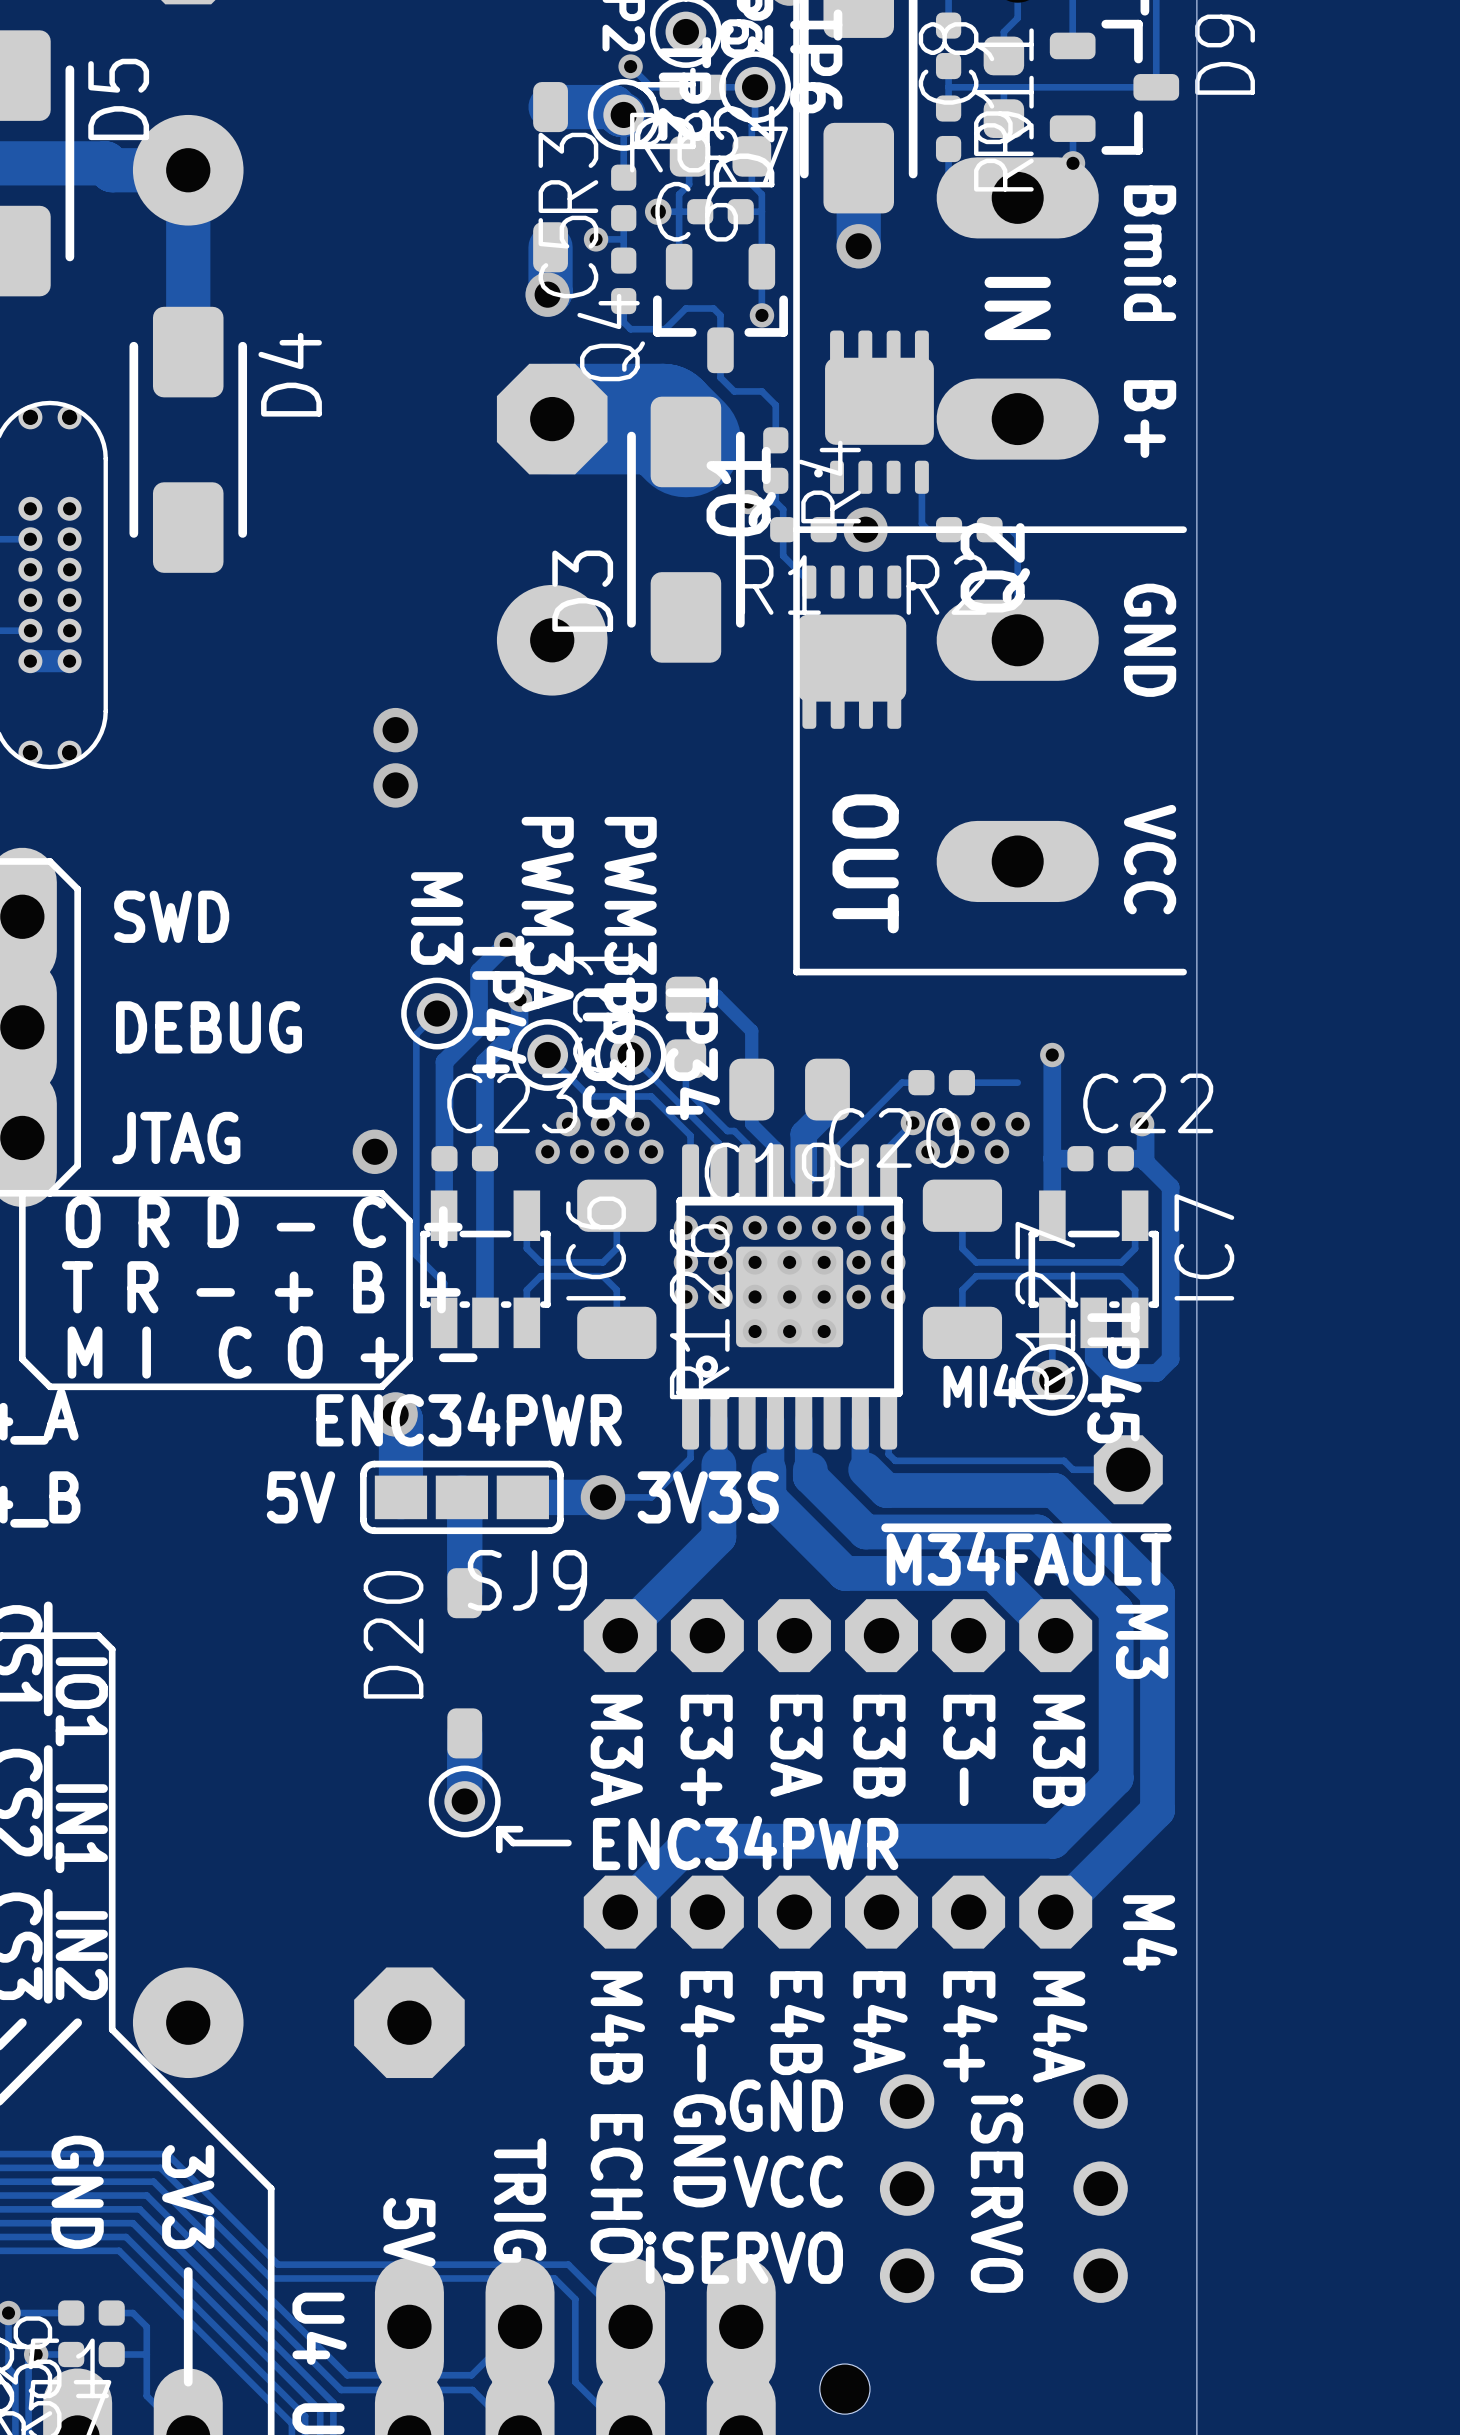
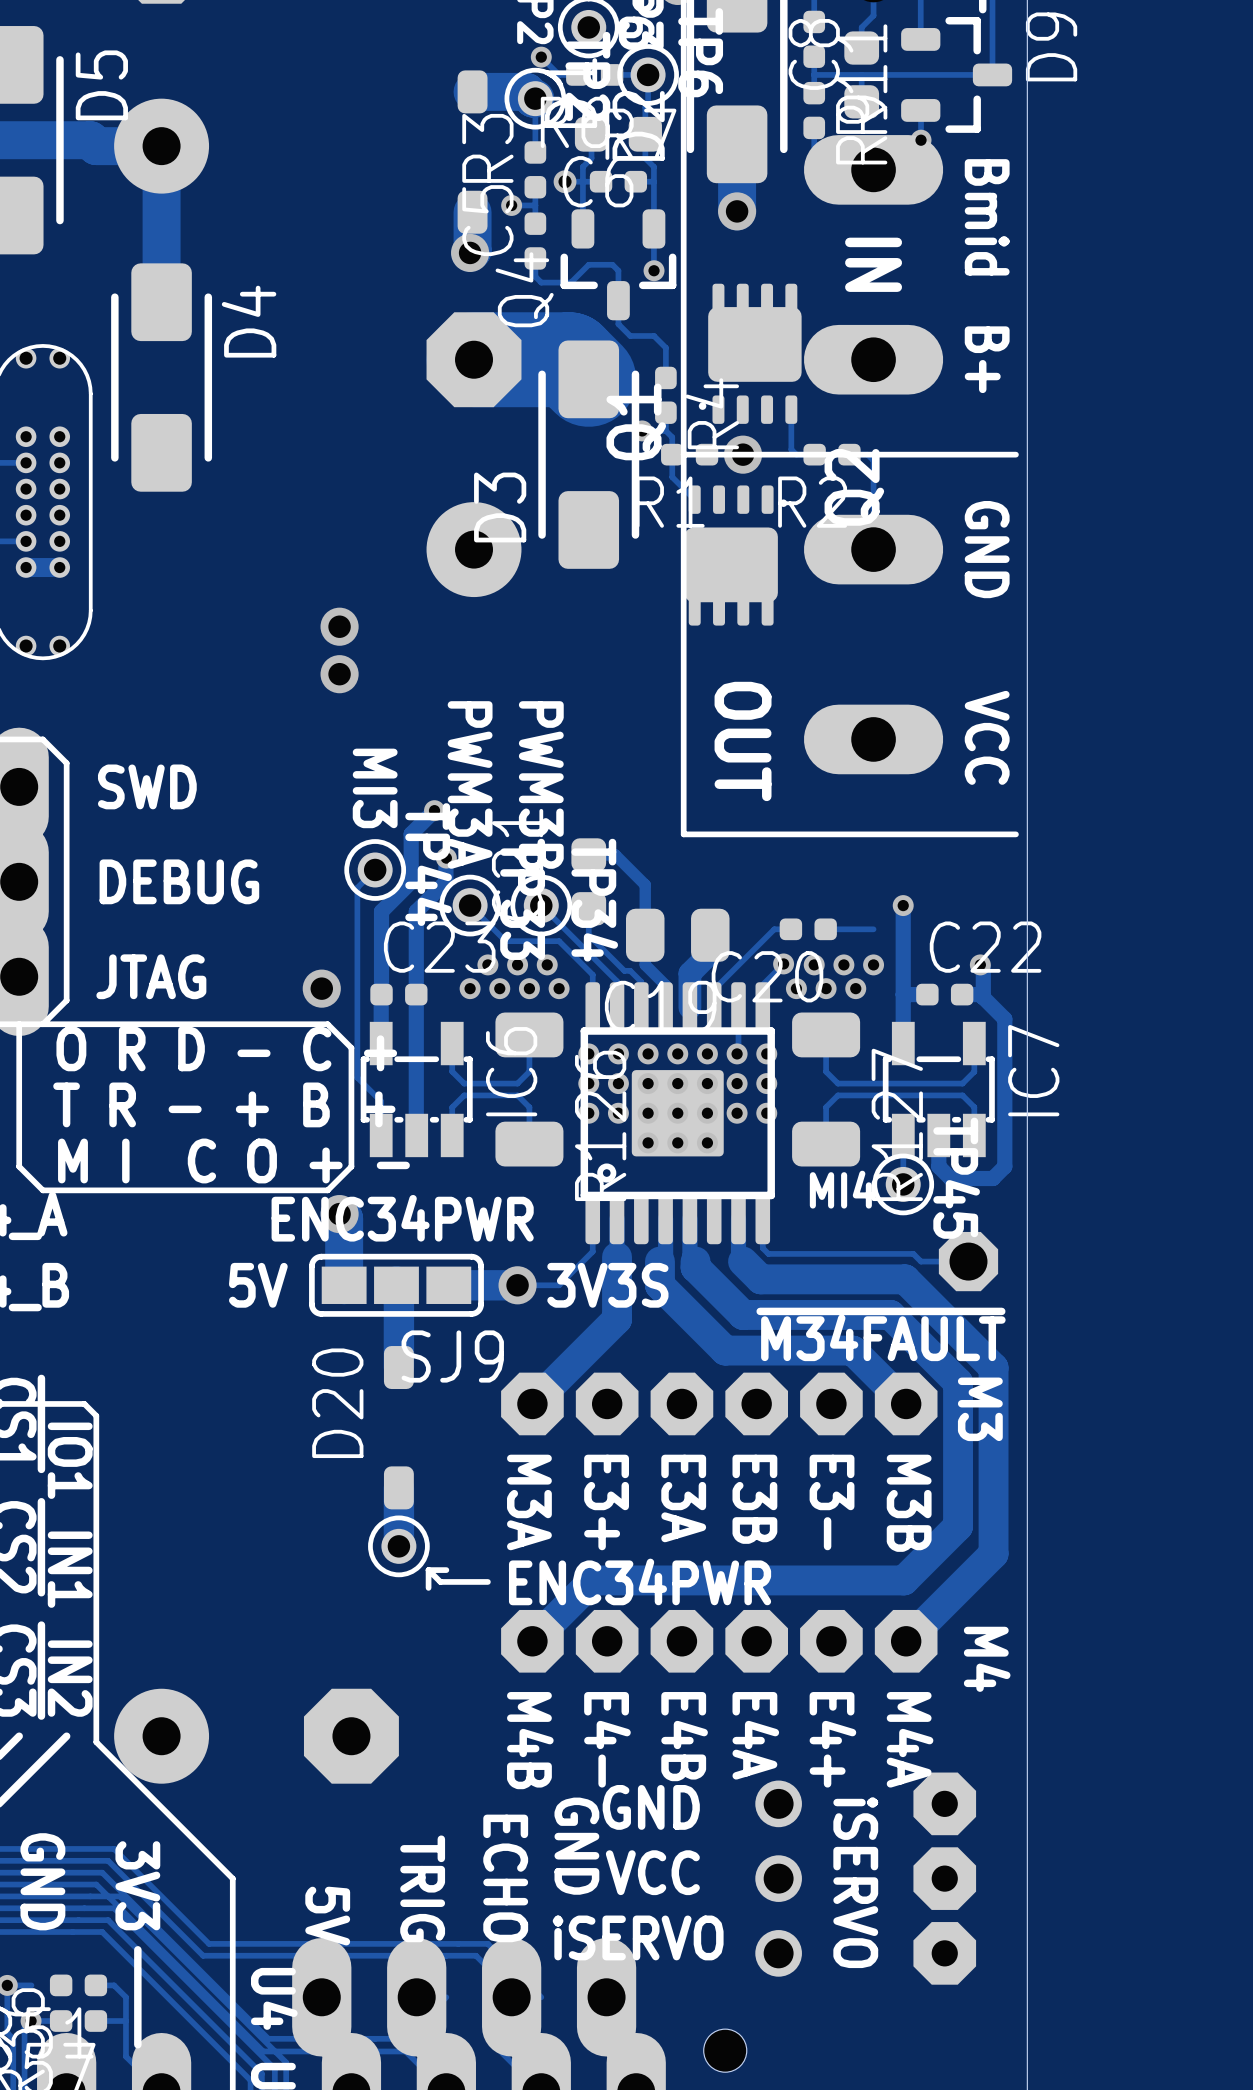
part footprint: [1073, 2074, 1128, 2303] -> [913, 1772, 977, 1985]
text position: GND (786, 2105) -> GND (651, 1807)
text position: GND (699, 2150) -> GND (576, 1846)
track: (132, 2154) (167, 2154) (278, 2264) -> (114, 1848) (209, 1943) (238, 1943)
track: (126, 2167) (160, 2167) (271, 2278) -> (108, 1860) (203, 1955) (232, 1955)
track: (119, 2181) (153, 2181) (347, 2375) -> (102, 1872) (268, 2038) (298, 2038)
text position: VCC (788, 2181) -> VCC (652, 1872)
text position: ECHO (616, 2188) -> ECHO (505, 1878)
text position: GND (77, 2192) -> GND (42, 1881)
track: (112, 2195) (146, 2195) (341, 2390) -> (96, 1884) (263, 2051) (292, 2051)
text position: 3V3 (188, 2196) -> 3V3 (137, 1885)
text position: TRIG (520, 2200) -> TRIG (422, 1888)
text position: 5V (409, 2232) -> 5V (327, 1916)
line: (188, 2271) (188, 2382) -> (137, 1949) (137, 2044)
track: (36, 2313) (71, 2313) -> none
part position: (575, 2326) -> (464, 1997)

